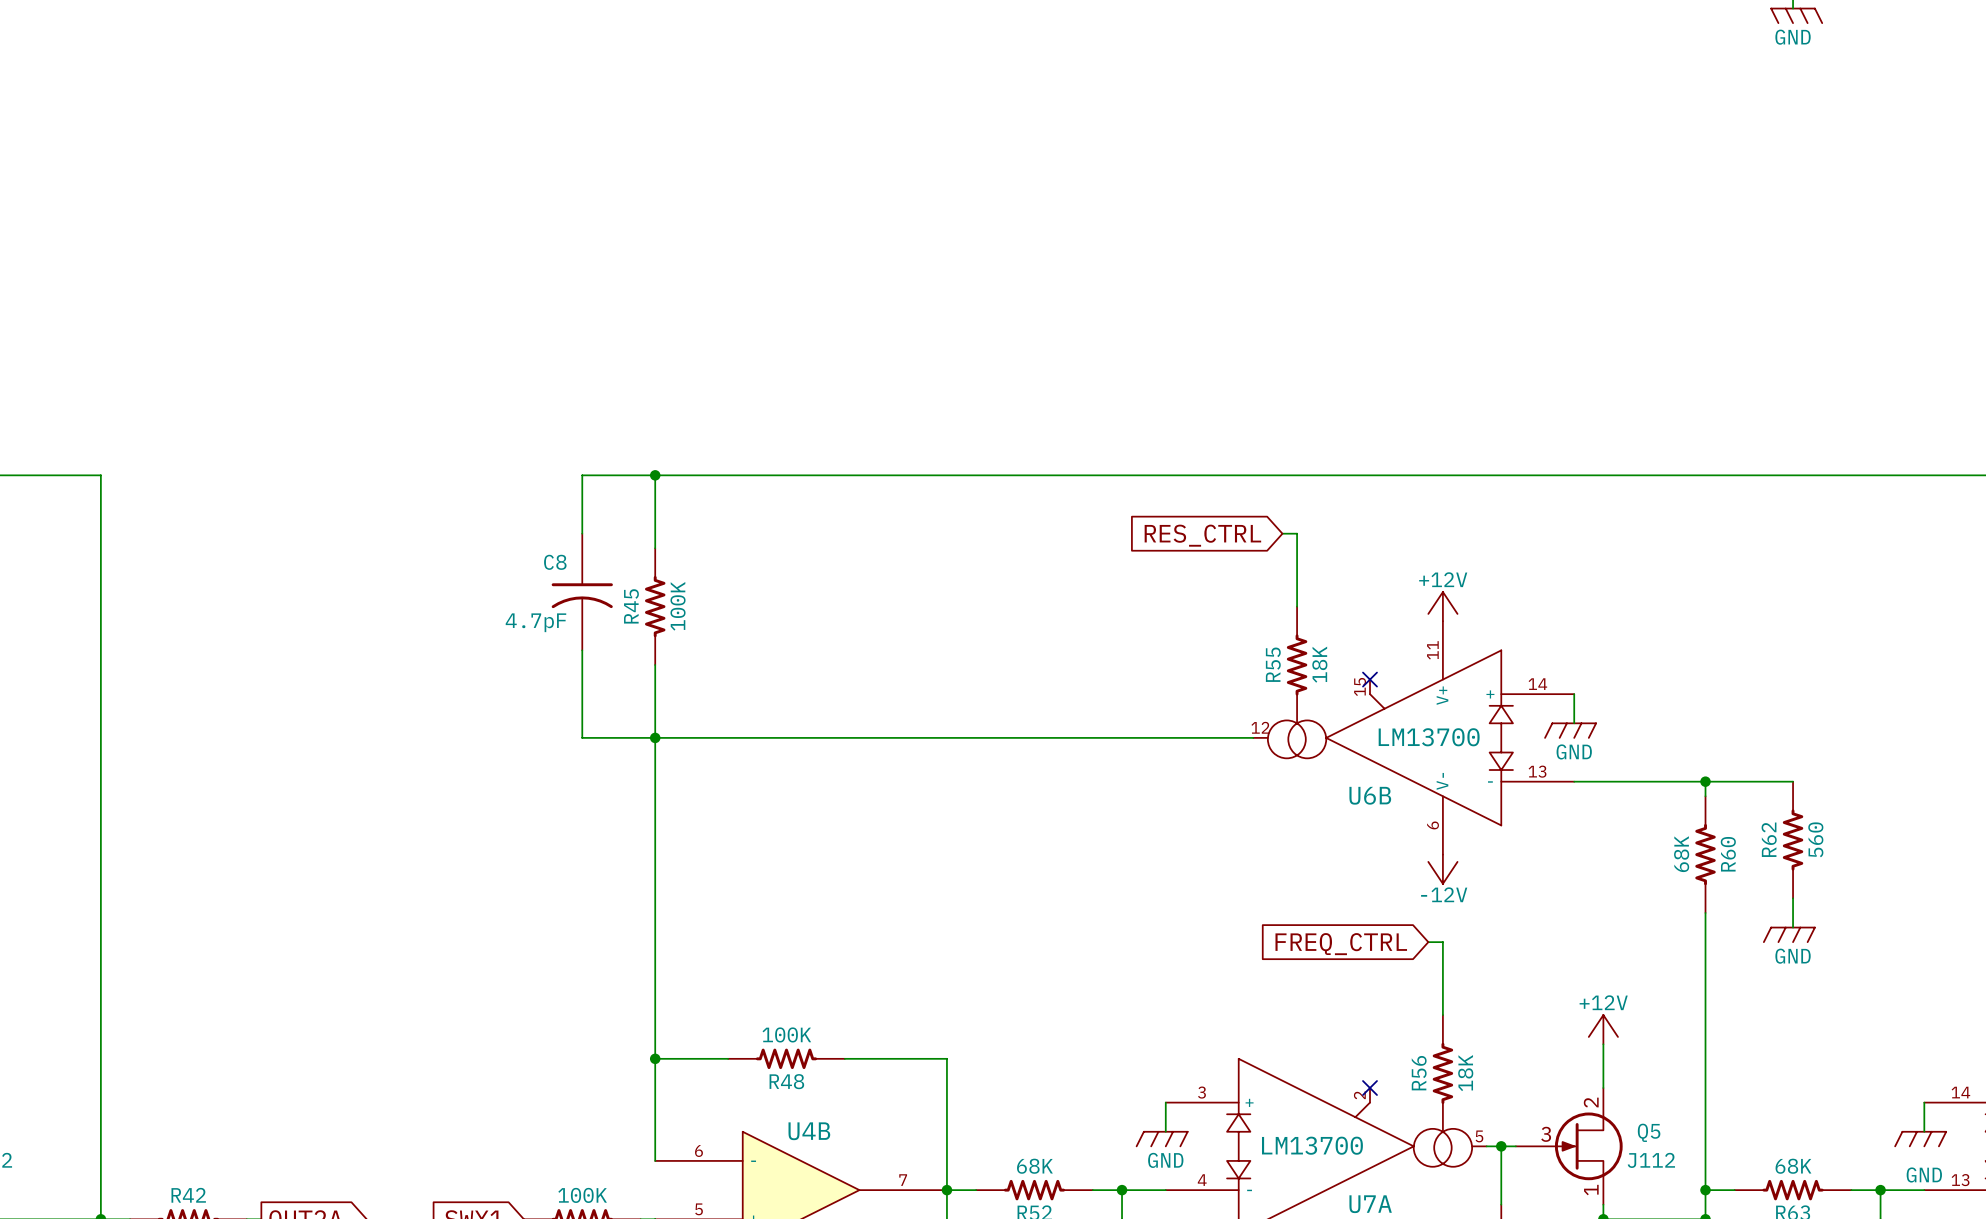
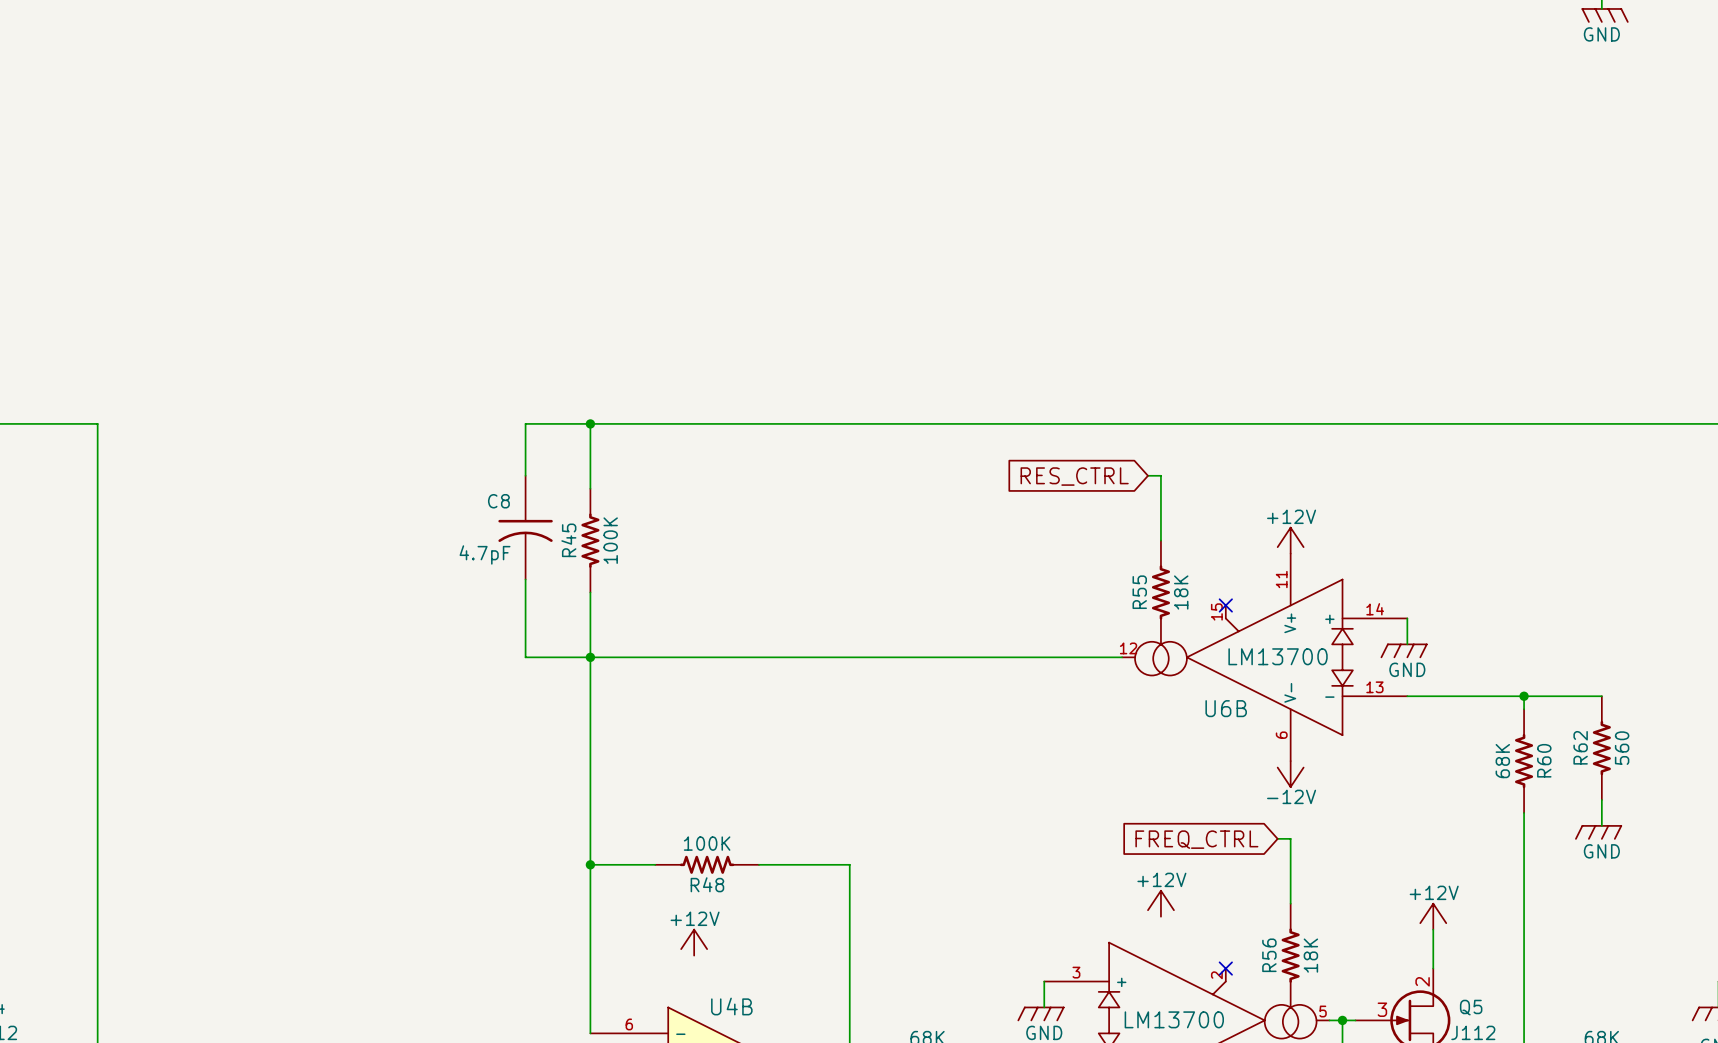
junction: none -> (590, 864)
power symbol: none -> +12V (1160, 903)
wire: (655, 1058) (728, 1058) -> (590, 864) (655, 864)
junction: (655, 1058) -> none
power symbol: none -> +12V (694, 942)
R48 position: (786, 1058) -> (707, 864)
wire: (844, 1058) (946, 1058) -> (758, 864) (849, 864) (849, 942)

